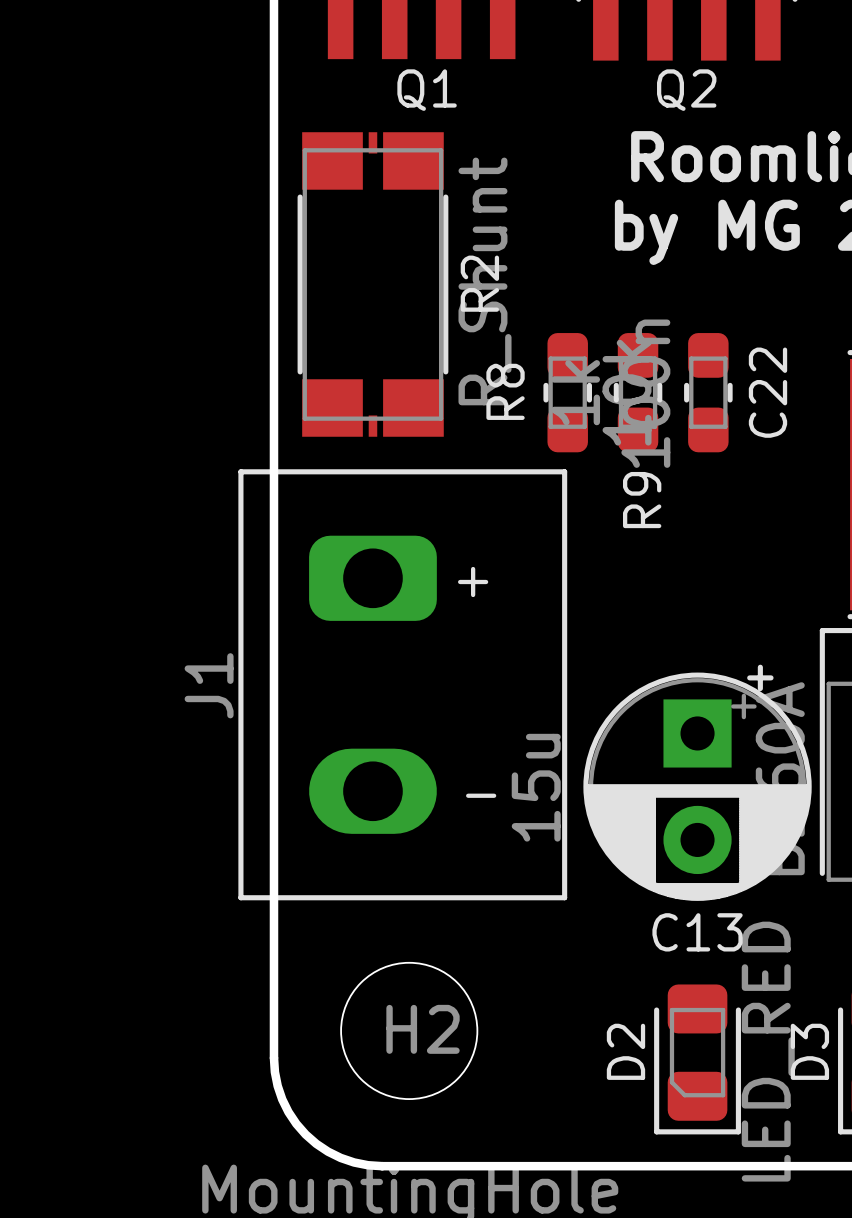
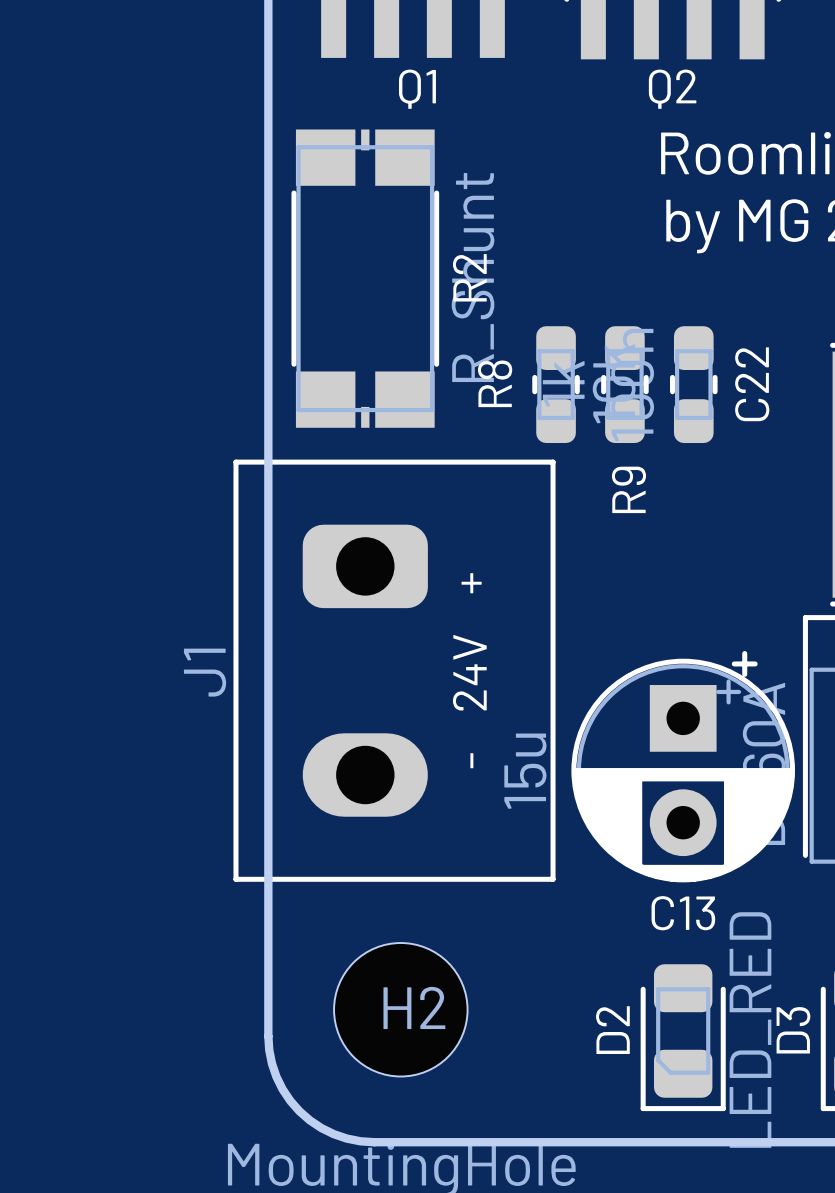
J1 text: + (473, 582) -> none
J1 text: none -> - 24V + (469, 670)
J1 text: - (481, 795) -> none

